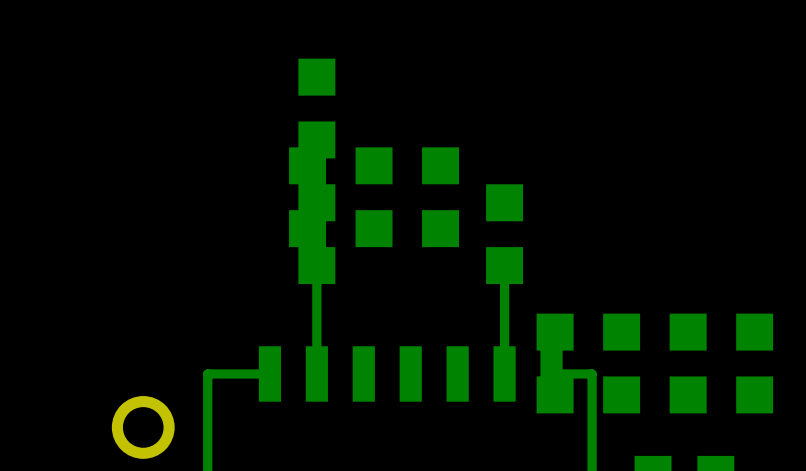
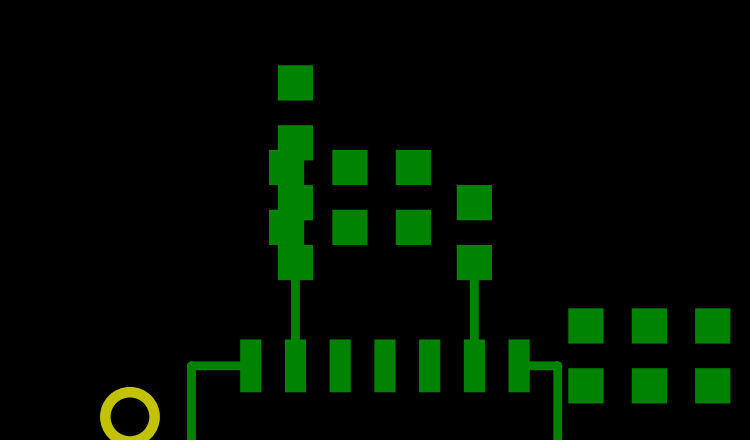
part: (555, 363) -> none

